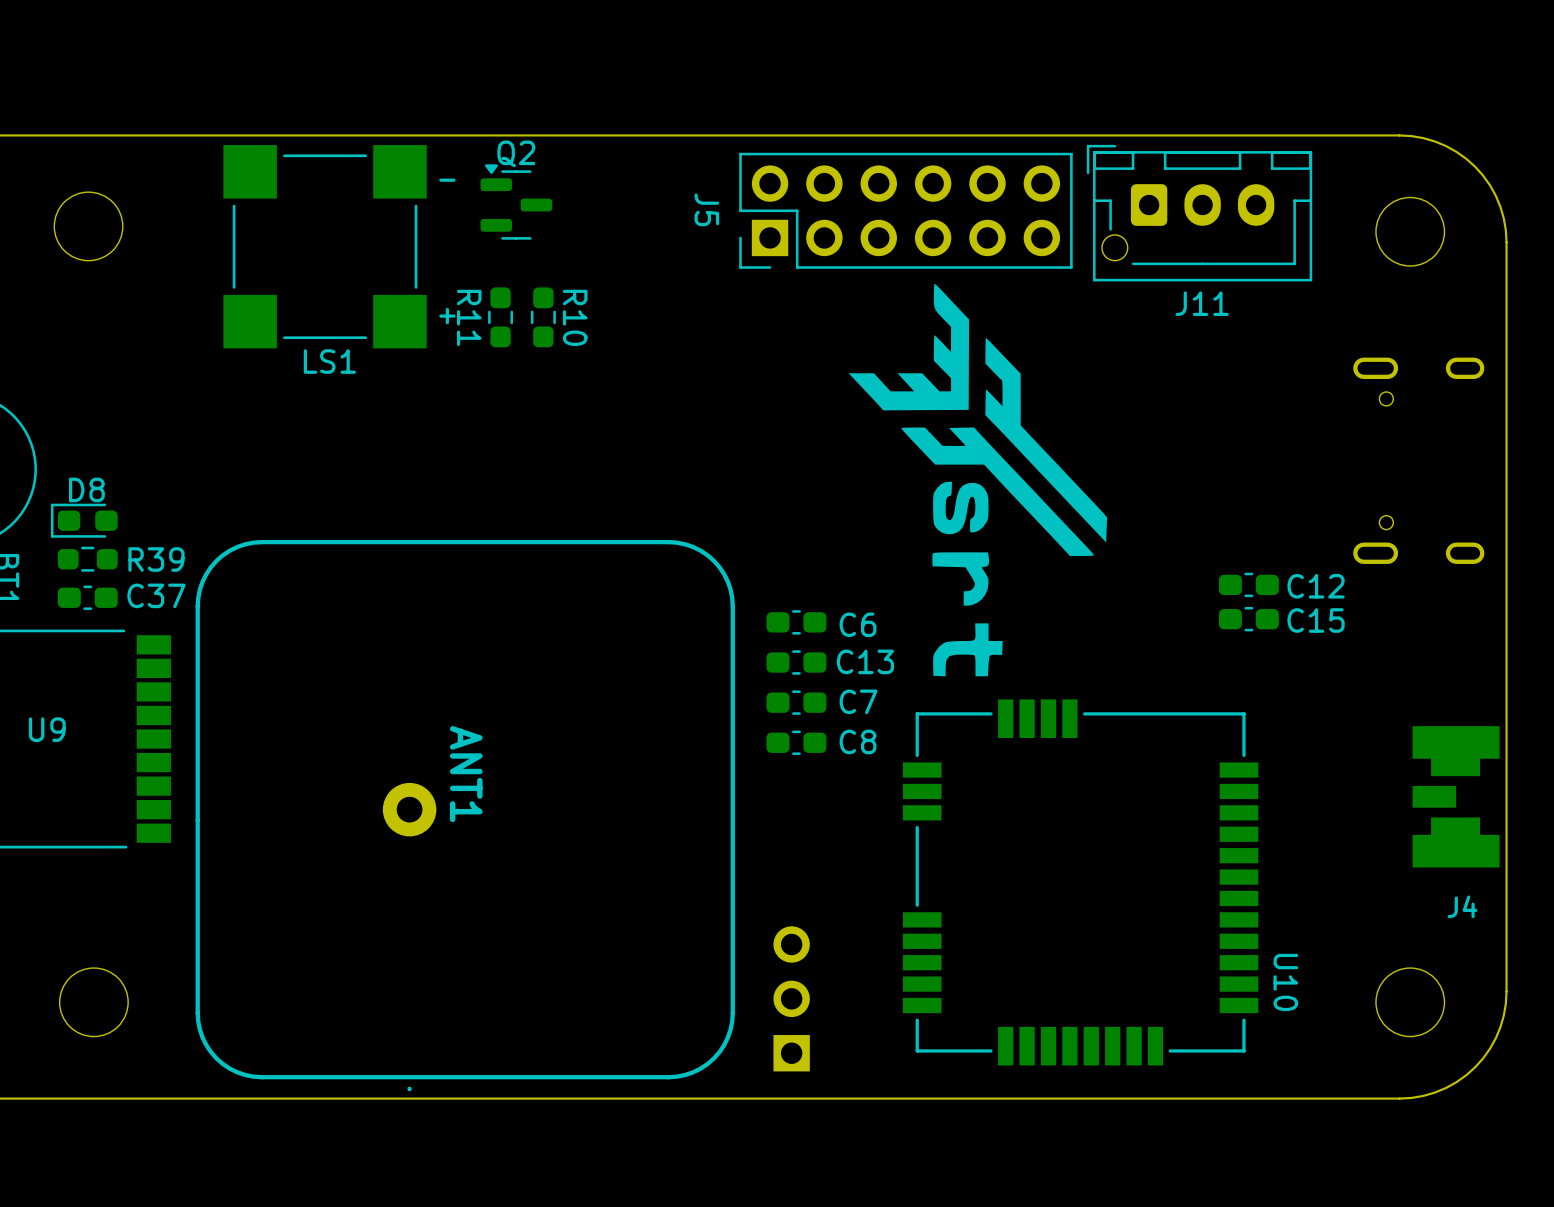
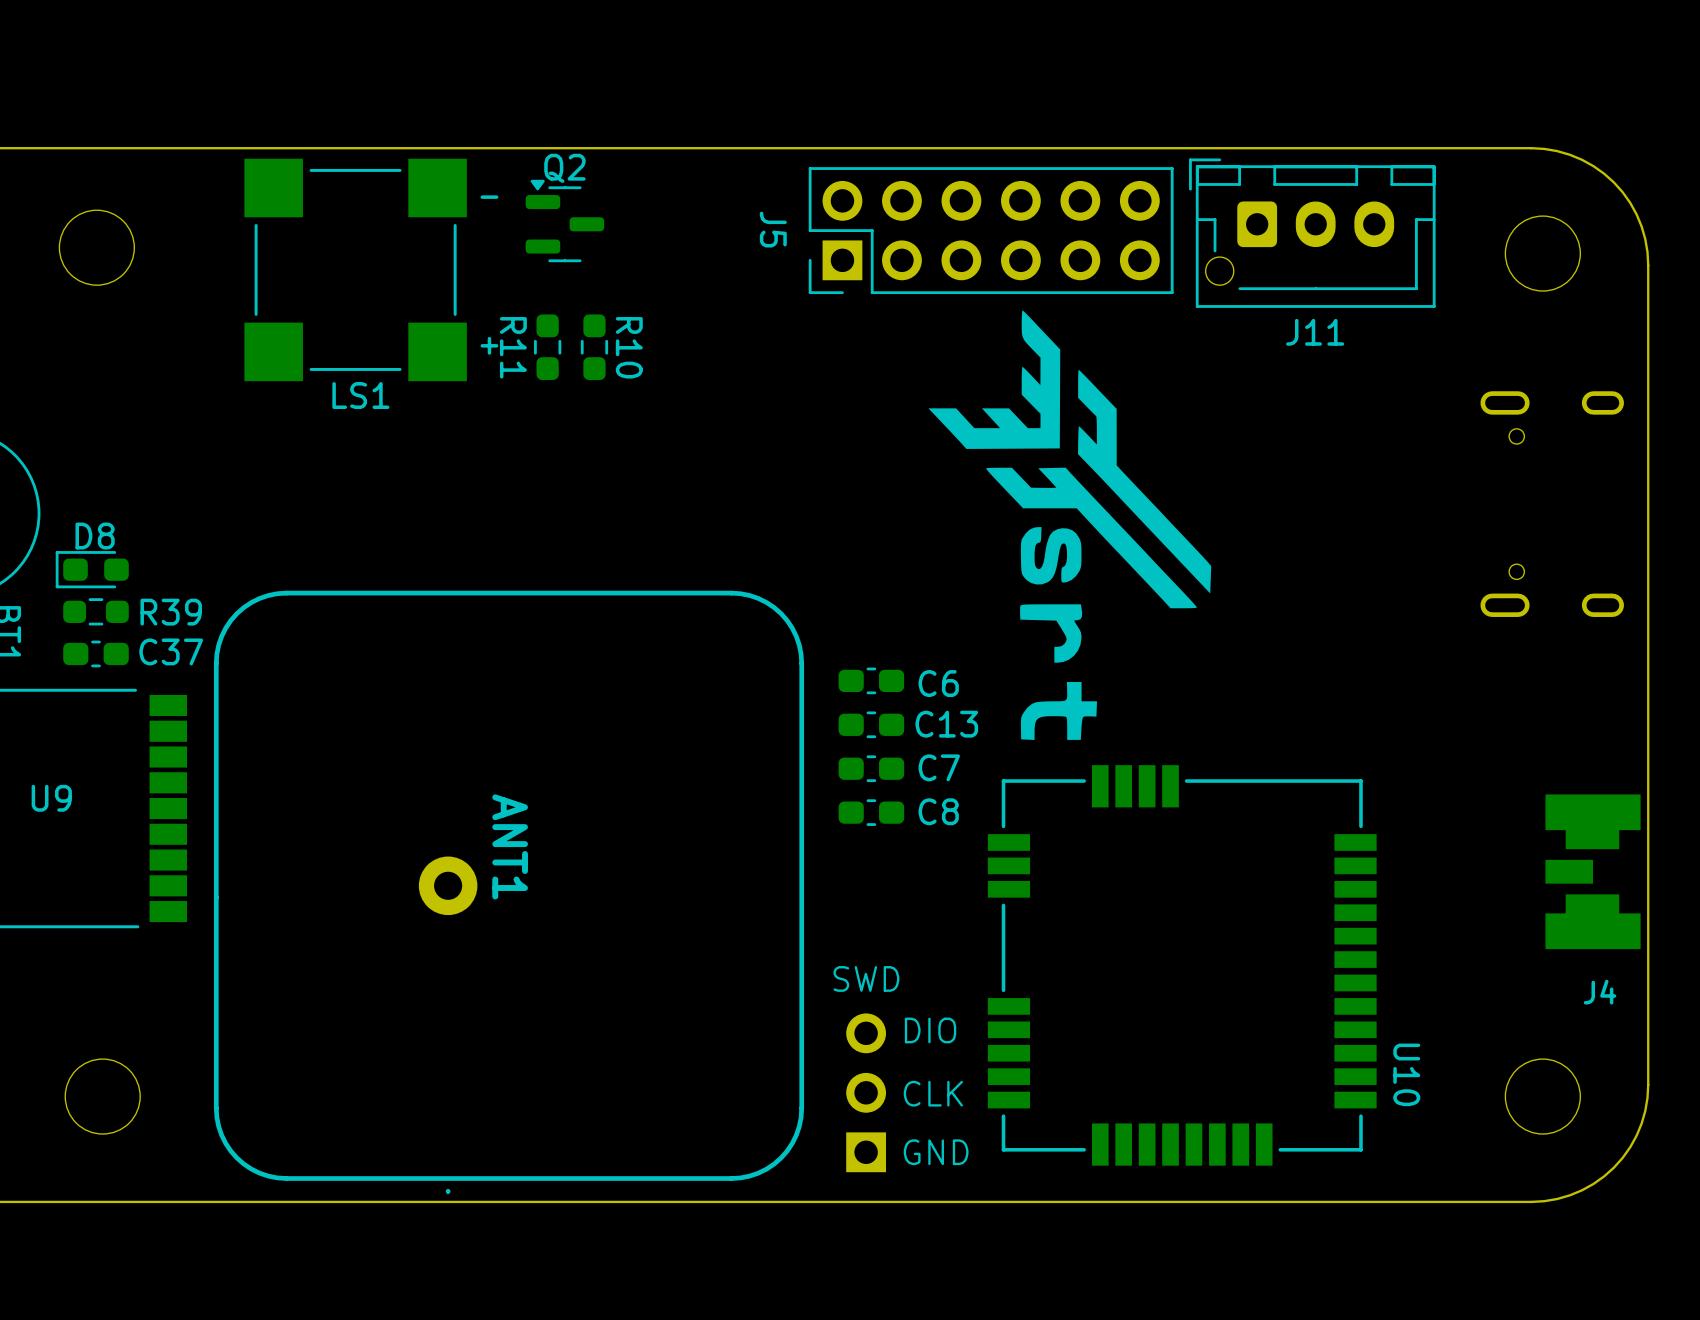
C12: (1248, 584) -> none
C15: (1248, 619) -> none
text: none -> SWD (866, 978)
text: none -> DIO (930, 1030)
text: none -> CLK (933, 1093)
text: none -> GND (936, 1152)

